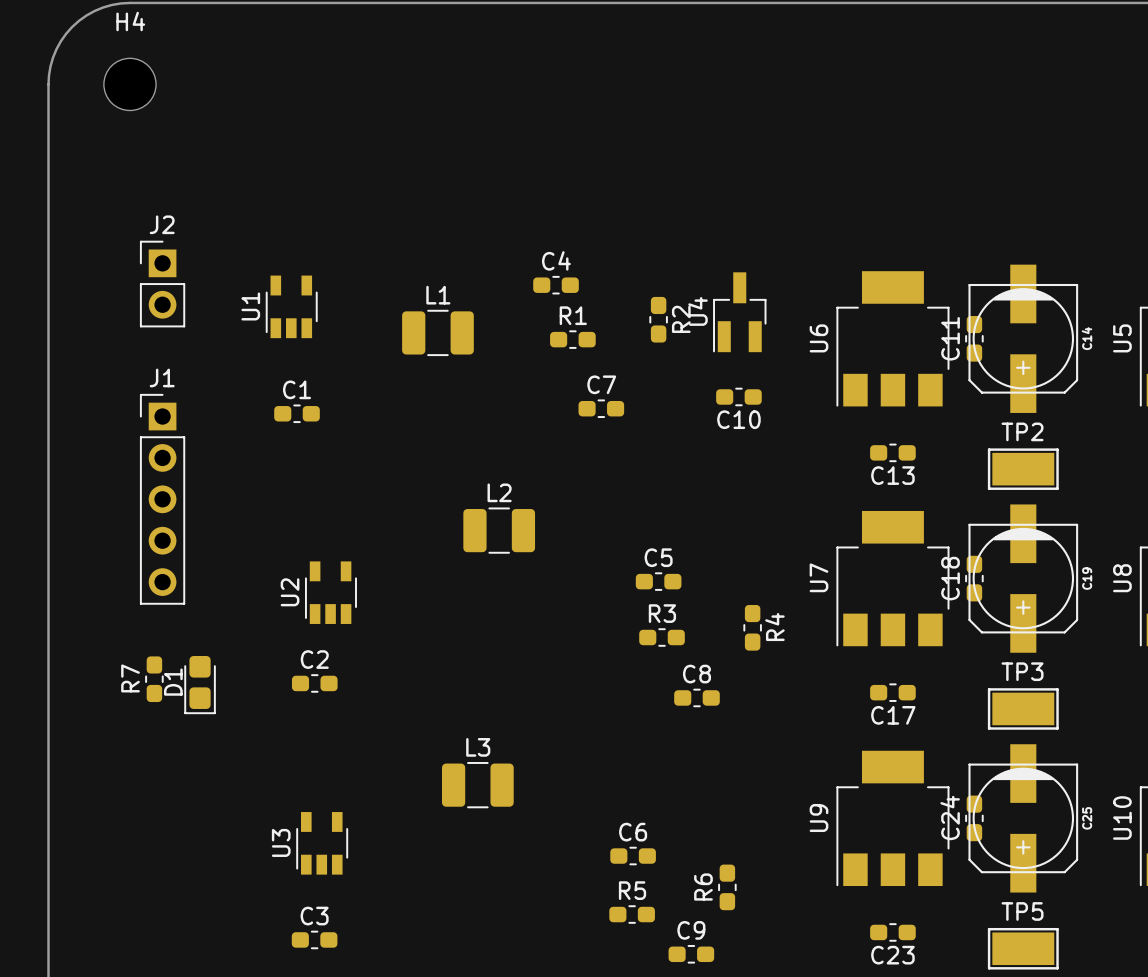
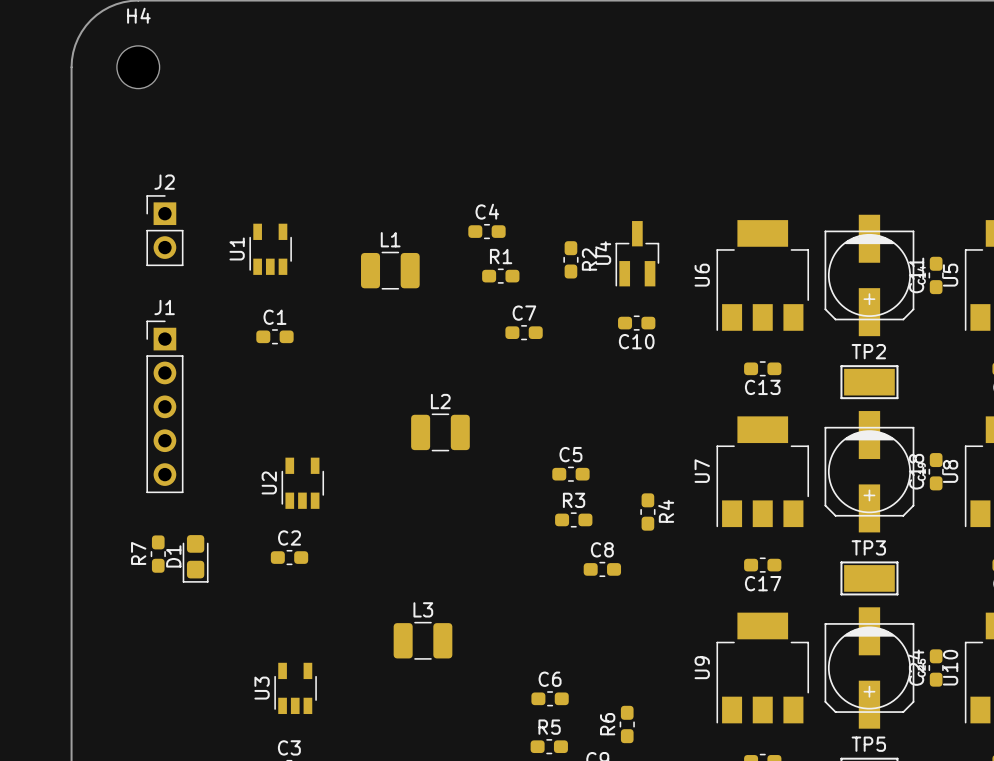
C11 position: (974, 338) -> (936, 275)
C18 position: (974, 578) -> (936, 471)
C24 position: (974, 818) -> (936, 667)

